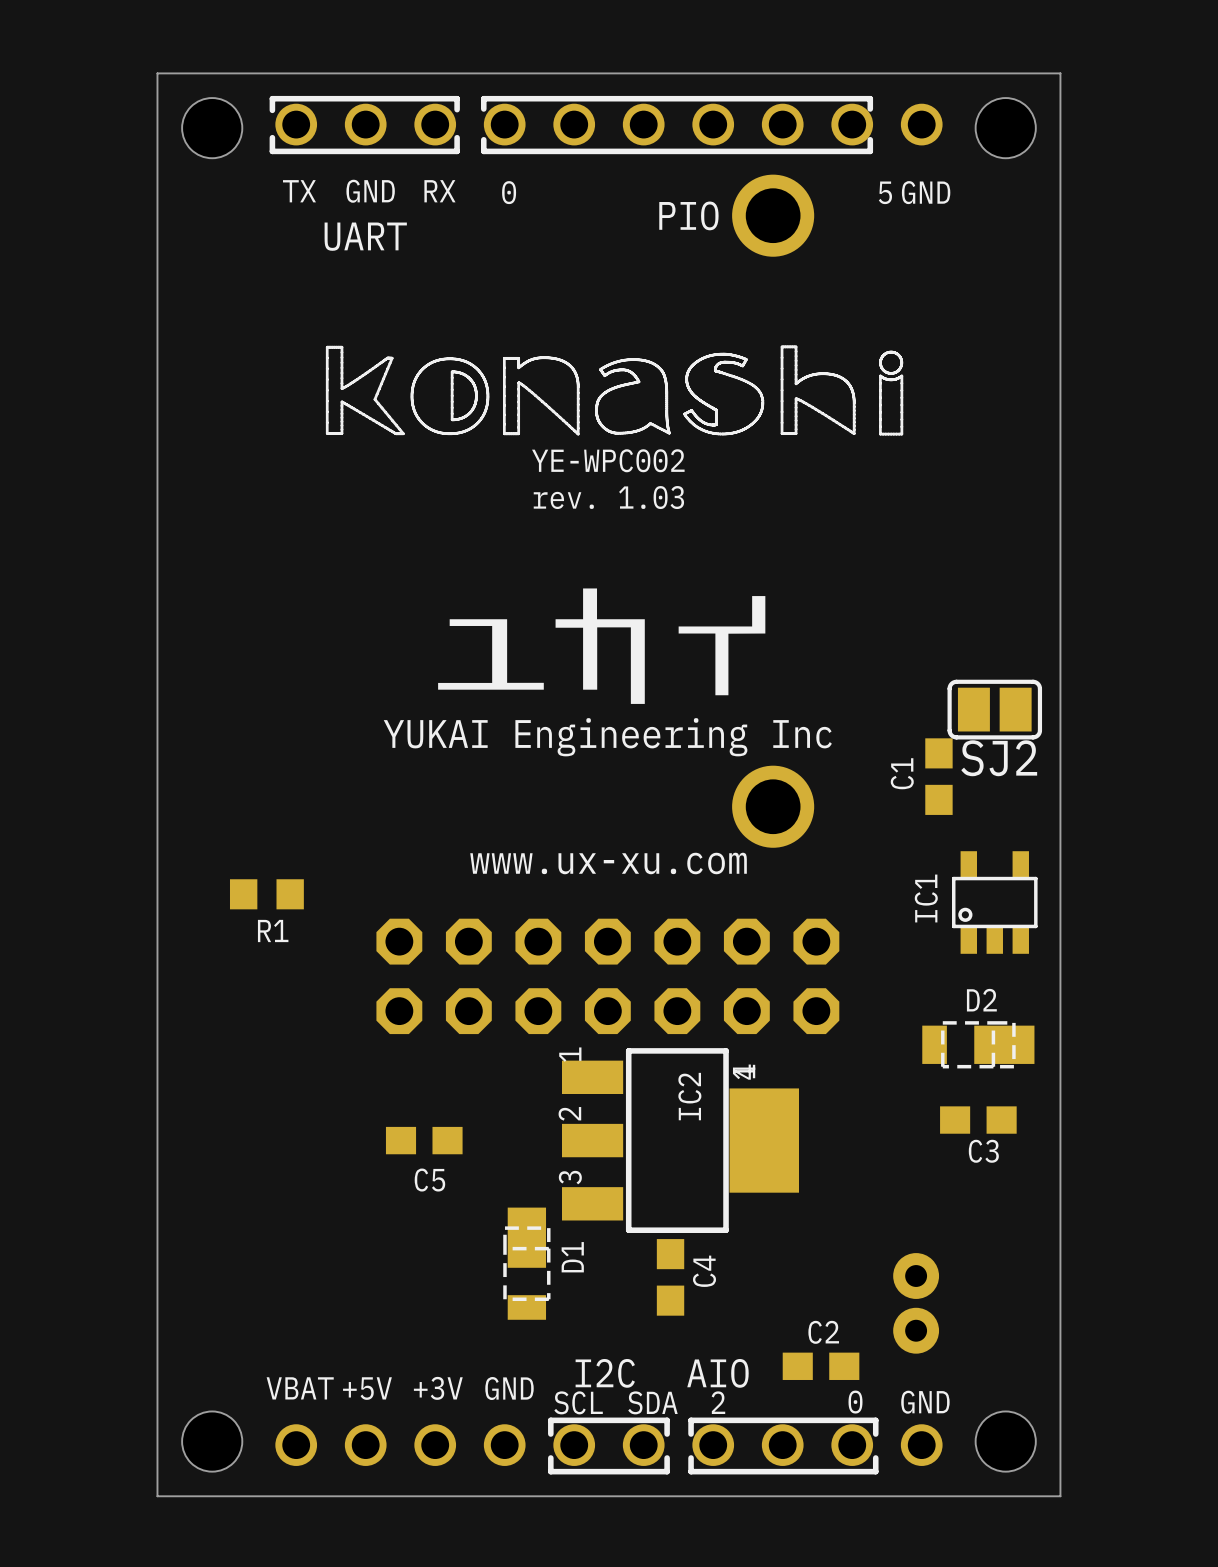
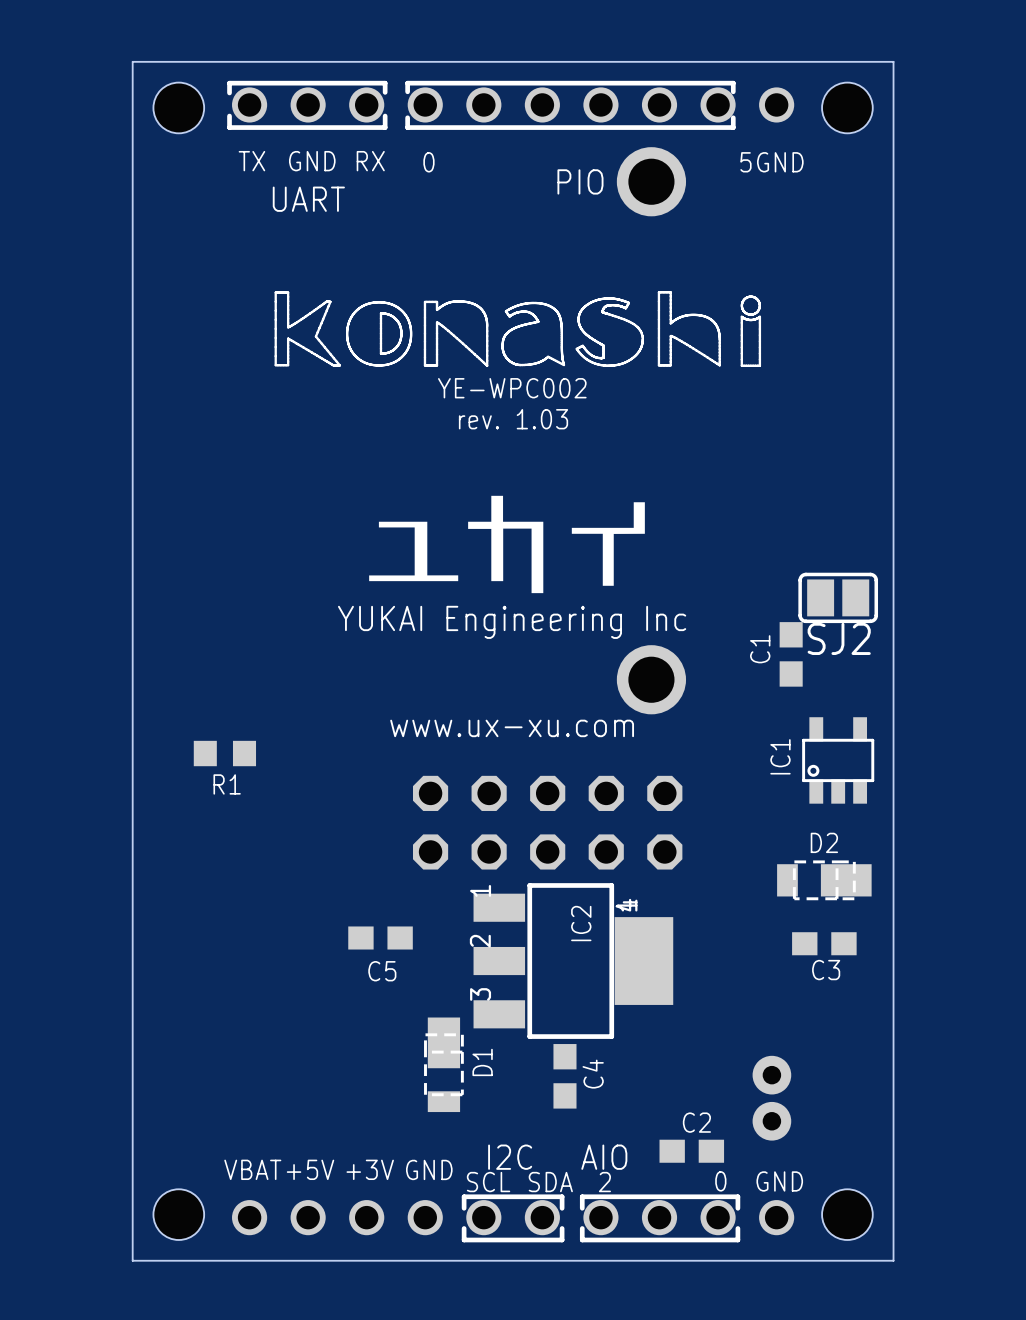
part: (607, 976) -> none
part: none -> (547, 822)
C5 position: (424, 1140) -> (380, 937)

